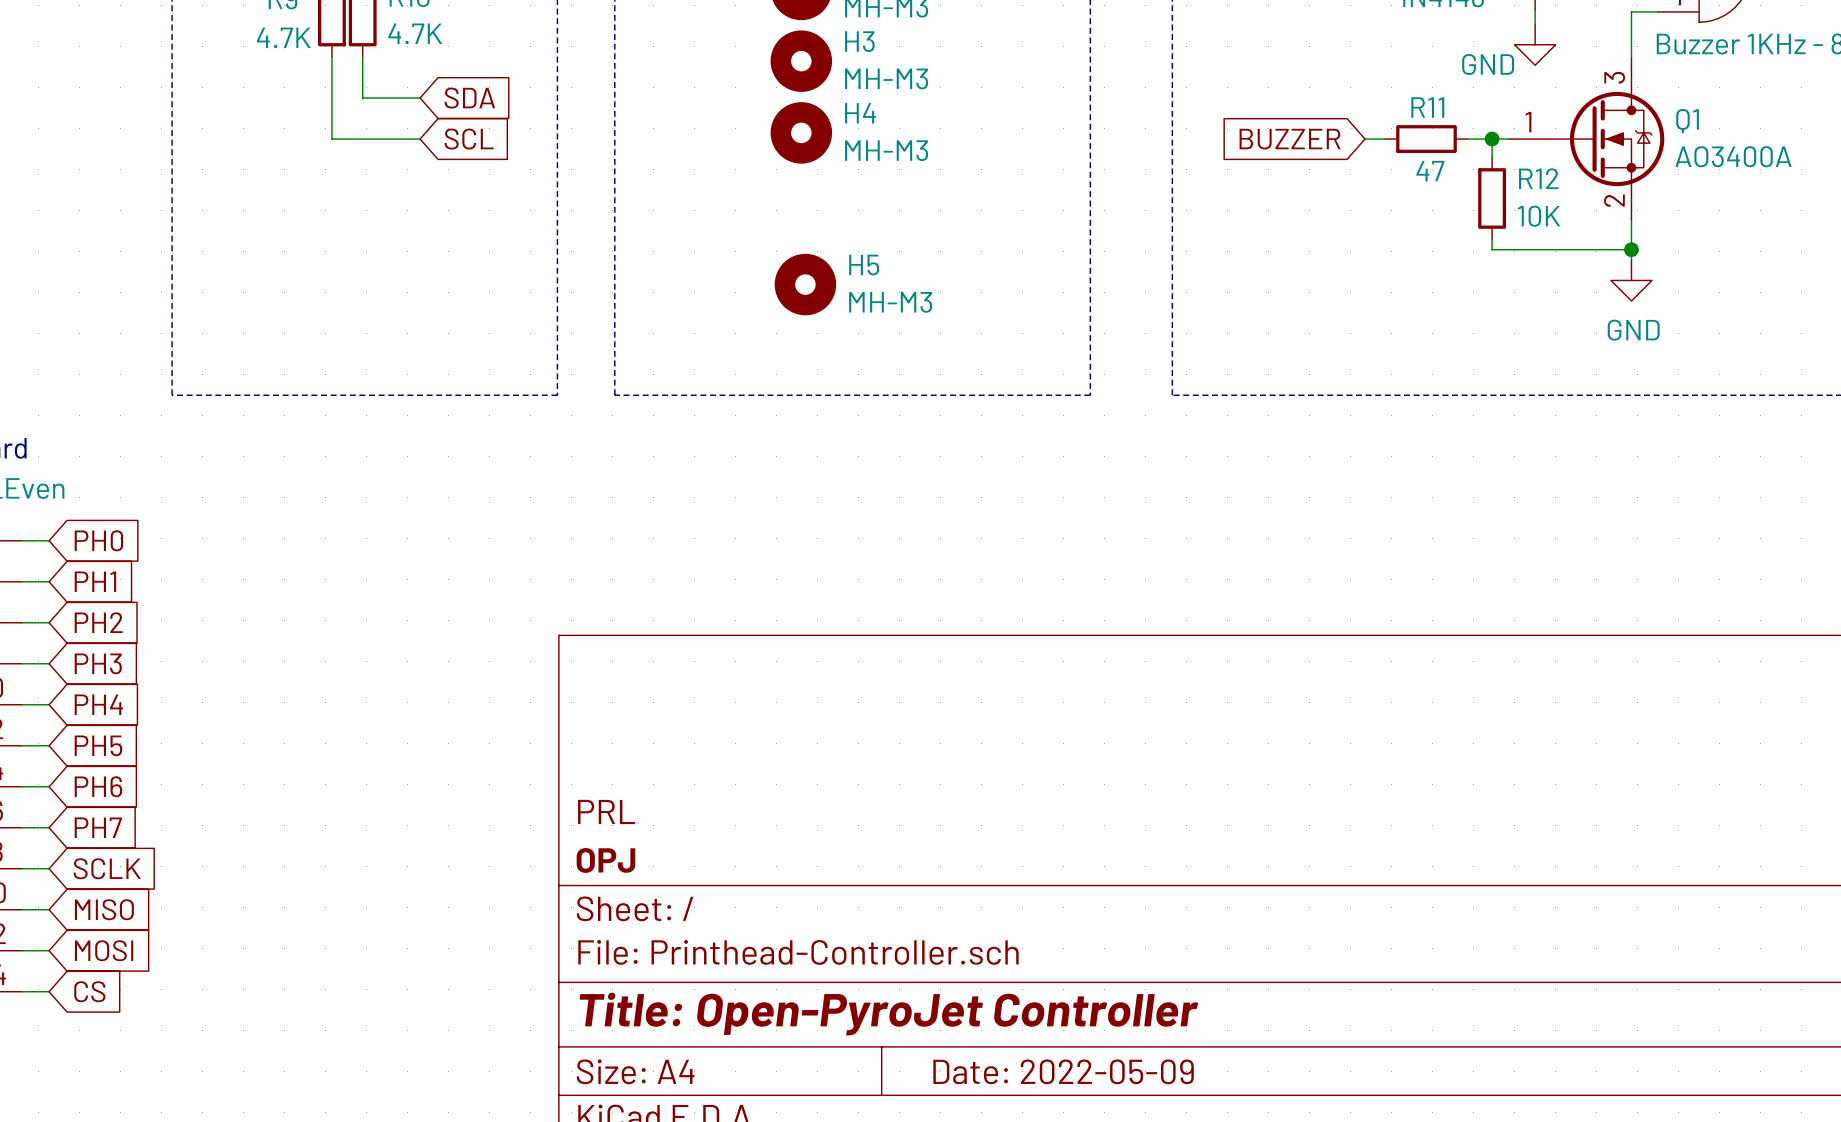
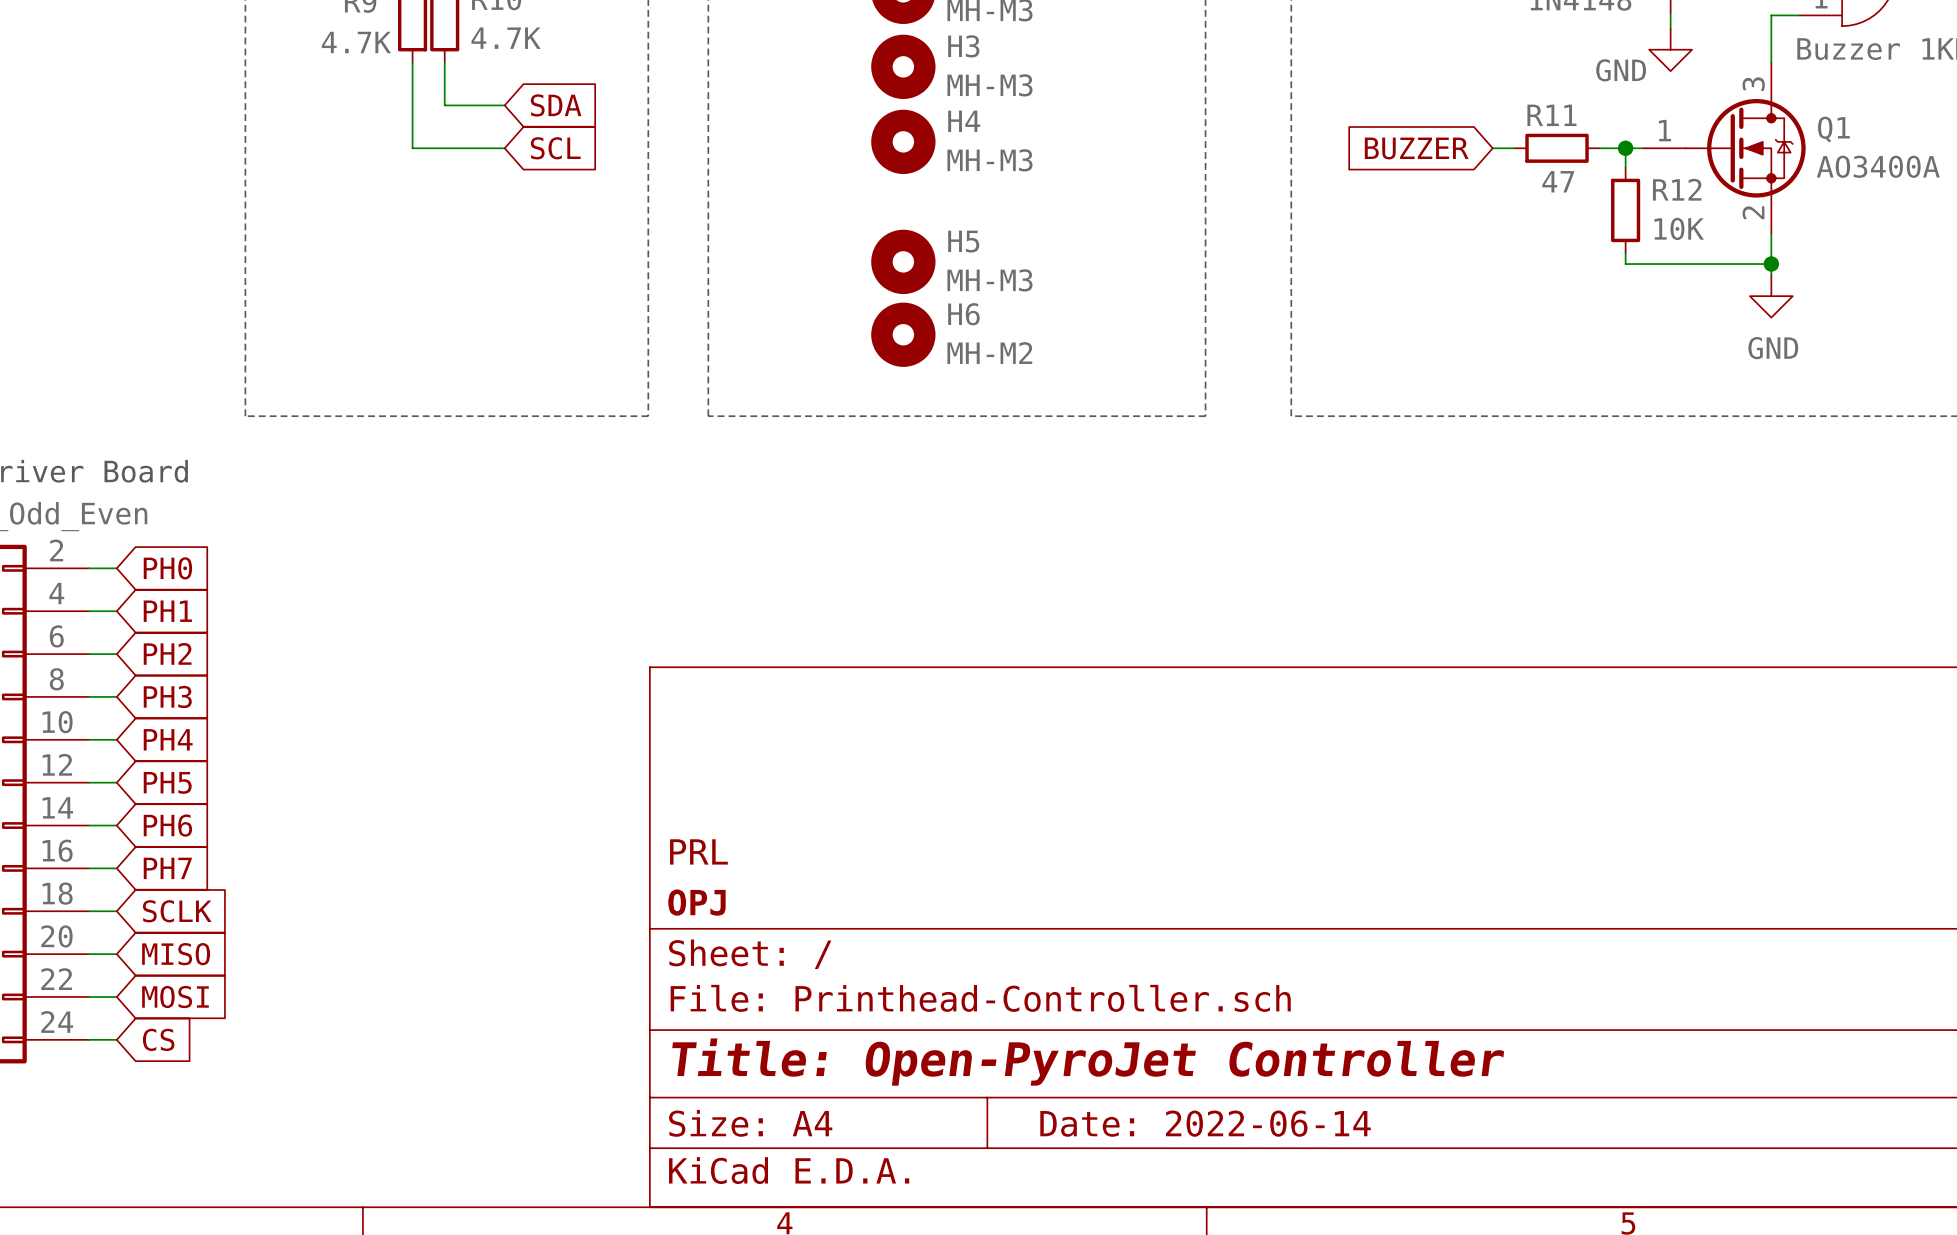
H5 position: (805, 284) -> (903, 261)
H6: none -> MH-M2 (903, 334)
title block: Date: 2022-05-09 (1063, 1071) -> Date: 2022-06-14 (1205, 1123)

